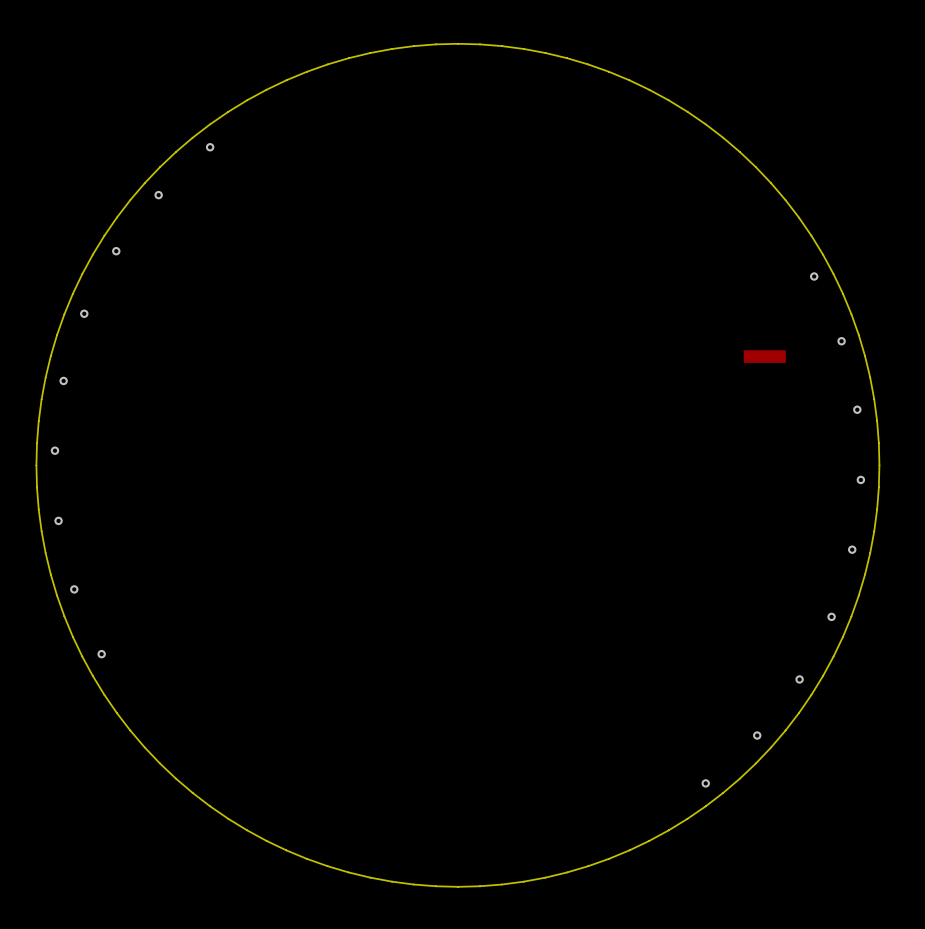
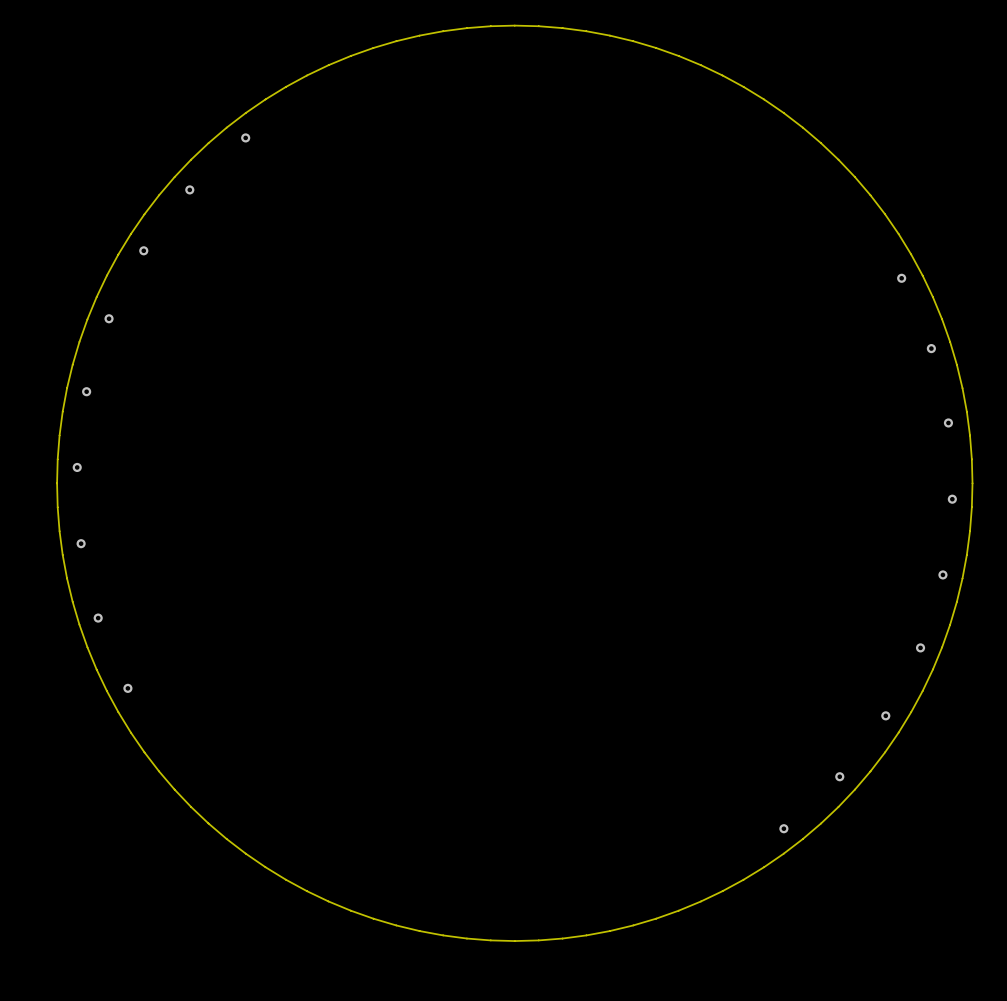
part: (764, 356) -> none

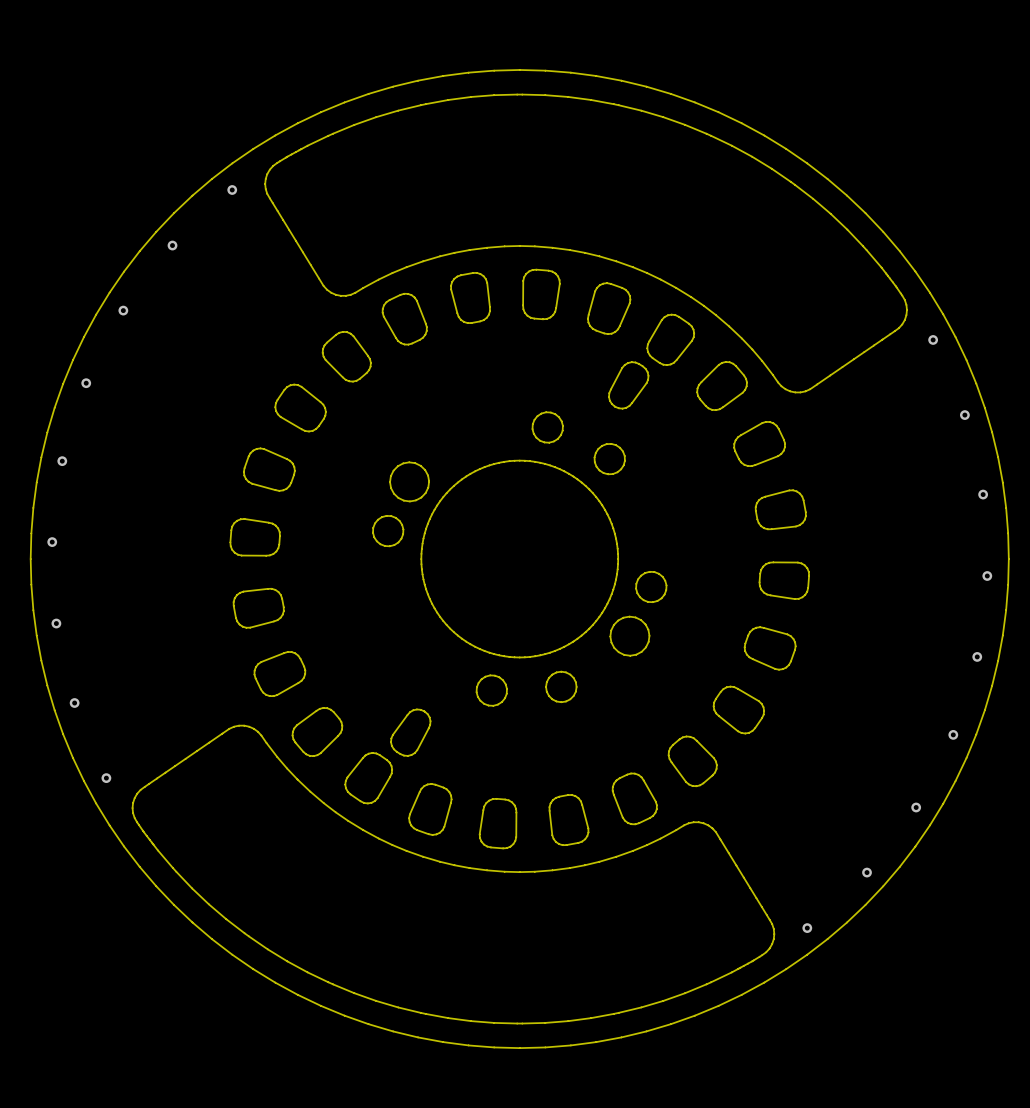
board edge: none -> (522, 94) (591, 99) (641, 110) (706, 133) (752, 156) (813, 198) (866, 250) (904, 300) (906, 315) (902, 324) (810, 389) (795, 392) (781, 386) (742, 338) (715, 314) (691, 297) (647, 273) (616, 261) (584, 252) (552, 247) (519, 245) (469, 250) (439, 256) (406, 267) (350, 294) (335, 294) (326, 289) (267, 193) (265, 178) (273, 165) (333, 133) (398, 110) (471, 96) (522, 94)
board edge: none -> (536, 269) (552, 271) (559, 279) (555, 311) (546, 318) (530, 317) (523, 309) (524, 277) (529, 271) (536, 269)
board edge: none -> (476, 272) (483, 276) (487, 282) (490, 310) (483, 320) (467, 323) (458, 316) (451, 285) (457, 276) (476, 272)
board edge: none -> (606, 283) (625, 289) (630, 299) (618, 329) (608, 334) (592, 328) (587, 318) (595, 291) (599, 285) (606, 283)
board edge: none -> (404, 293) (411, 295) (416, 300) (426, 327) (423, 337) (408, 344) (398, 340) (382, 312) (386, 302) (404, 293)
board edge: none -> (671, 314) (688, 323) (694, 333) (692, 340) (676, 359) (667, 365) (652, 358) (647, 348) (661, 319) (671, 314)
board edge: none -> (343, 331) (353, 336) (370, 362) (366, 373) (353, 381) (342, 377) (325, 359) (322, 352) (326, 342) (343, 331)
board edge: none -> (725, 361) (733, 363) (744, 375) (746, 386) (742, 392) (722, 407) (712, 409) (700, 399) (697, 388) (718, 364) (725, 361)
board edge: none -> (631, 362) (639, 363) (645, 368) (648, 379) (629, 405) (618, 408) (611, 403) (609, 393) (622, 367) (631, 362)
board edge: none -> (294, 384) (301, 386) (325, 408) (323, 419) (312, 430) (301, 429) (280, 416) (276, 410) (275, 403) (284, 389) (294, 384)
board edge: none -> (546, 412) (555, 414) (562, 425) (560, 435) (549, 442) (536, 437) (532, 429) (537, 416) (546, 412)
board edge: none -> (766, 421) (773, 423) (778, 428) (785, 443) (783, 450) (778, 456) (755, 465) (744, 464) (735, 451) (735, 440) (741, 435) (766, 421)
board edge: none -> (611, 443) (622, 451) (624, 460) (617, 472) (608, 474) (599, 470) (594, 457) (598, 448) (611, 443)
board edge: none -> (260, 448) (286, 458) (292, 463) (294, 474) (286, 488) (275, 490) (252, 483) (246, 479) (243, 471) (248, 456) (253, 450) (260, 448)
board edge: none -> (519, 460) (540, 462) (559, 469) (577, 479) (589, 489) (599, 501) (609, 519) (616, 538) (618, 559) (616, 579) (609, 599) (599, 616) (589, 628) (577, 638) (559, 648) (540, 655) (519, 657) (499, 655) (479, 648) (461, 638) (450, 628) (440, 616) (429, 599) (423, 579) (421, 559) (423, 538) (429, 519) (440, 501) (450, 489) (461, 479) (479, 469) (499, 462) (519, 460)
board edge: none -> (409, 462) (415, 463) (425, 470) (429, 481) (428, 487) (421, 497) (409, 501) (403, 500) (393, 493) (390, 482) (390, 476) (397, 466) (409, 462)
board edge: none -> (793, 490) (799, 493) (803, 500) (805, 516) (802, 522) (796, 526) (771, 529) (760, 526) (755, 510) (758, 500) (765, 496) (793, 490)
board edge: none -> (386, 515) (395, 517) (403, 529) (398, 542) (389, 546) (376, 541) (373, 532) (374, 523) (386, 515)
board edge: none -> (244, 518) (275, 525) (279, 535) (276, 551) (266, 555) (241, 555) (234, 552) (230, 546) (232, 526) (237, 520) (244, 518)
board edge: none -> (773, 562) (797, 562) (804, 565) (809, 575) (805, 594) (795, 599) (763, 592) (759, 586) (761, 569) (766, 564) (773, 562)
board edge: none -> (649, 571) (662, 576) (666, 585) (664, 594) (652, 602) (643, 600) (636, 588) (641, 575) (649, 571)
board edge: none -> (271, 588) (278, 592) (282, 598) (283, 611) (280, 617) (250, 627) (239, 624) (233, 605) (236, 595) (243, 591) (271, 588)
board edge: none -> (629, 616) (635, 617) (645, 624) (649, 635) (648, 641) (641, 651) (630, 655) (624, 654) (614, 647) (610, 636) (611, 630) (618, 620) (629, 616)
board edge: none -> (760, 627) (787, 634) (793, 639) (794, 650) (786, 667) (775, 668) (746, 654) (744, 647) (748, 635) (752, 629) (760, 627)
board edge: none -> (287, 651) (295, 653) (300, 658) (305, 670) (303, 677) (277, 695) (266, 694) (255, 678) (255, 667) (261, 661) (287, 651)
board edge: none -> (561, 671) (570, 674) (576, 686) (573, 695) (561, 702) (548, 695) (546, 686) (552, 674) (561, 671)
board edge: none -> (490, 675) (503, 680) (506, 689) (502, 701) (493, 705) (484, 703) (476, 692) (478, 682) (490, 675)
board edge: none -> (730, 686) (758, 701) (763, 707) (762, 718) (749, 732) (738, 731) (714, 710) (715, 699) (723, 689) (730, 686)
board edge: none -> (323, 707) (333, 712) (341, 722) (342, 729) (320, 753) (309, 755) (295, 742) (292, 731) (296, 725) (323, 707)
board edge: none -> (416, 709) (427, 714) (430, 724) (417, 750) (411, 755) (403, 755) (393, 749) (391, 738) (409, 712) (416, 709)
board edge: none -> (244, 725) (258, 731) (297, 779) (323, 803) (348, 820) (392, 845) (423, 856) (454, 865) (487, 870) (519, 872) (569, 868) (599, 861) (633, 850) (688, 823) (703, 823) (715, 832) (772, 924) (774, 934) (772, 944) (766, 952) (752, 961) (685, 993) (618, 1012) (568, 1021) (522, 1023) (471, 1021) (420, 1012) (354, 993) (287, 961) (226, 919) (176, 871) (134, 818) (133, 802) (140, 789) (229, 728) (244, 725)
board edge: none -> (686, 736) (696, 740) (713, 758) (716, 765) (712, 775) (696, 786) (686, 782) (668, 755) (672, 745) (686, 736)
board edge: none -> (372, 752) (386, 760) (392, 769) (377, 798) (367, 803) (350, 794) (345, 784) (347, 777) (362, 758) (372, 752)
board edge: none -> (631, 773) (641, 777) (656, 805) (653, 815) (635, 824) (627, 822) (622, 817) (612, 790) (616, 780) (631, 773)
board edge: none -> (431, 783) (446, 789) (451, 799) (444, 826) (439, 832) (432, 834) (413, 828) (409, 818) (421, 788) (431, 783)
board edge: none -> (571, 794) (580, 801) (588, 832) (582, 841) (562, 845) (555, 841) (552, 835) (549, 807) (555, 797) (571, 794)
board edge: none -> (496, 798) (508, 800) (516, 808) (516, 837) (513, 844) (506, 848) (487, 846) (480, 838) (484, 806) (489, 800) (496, 798)

